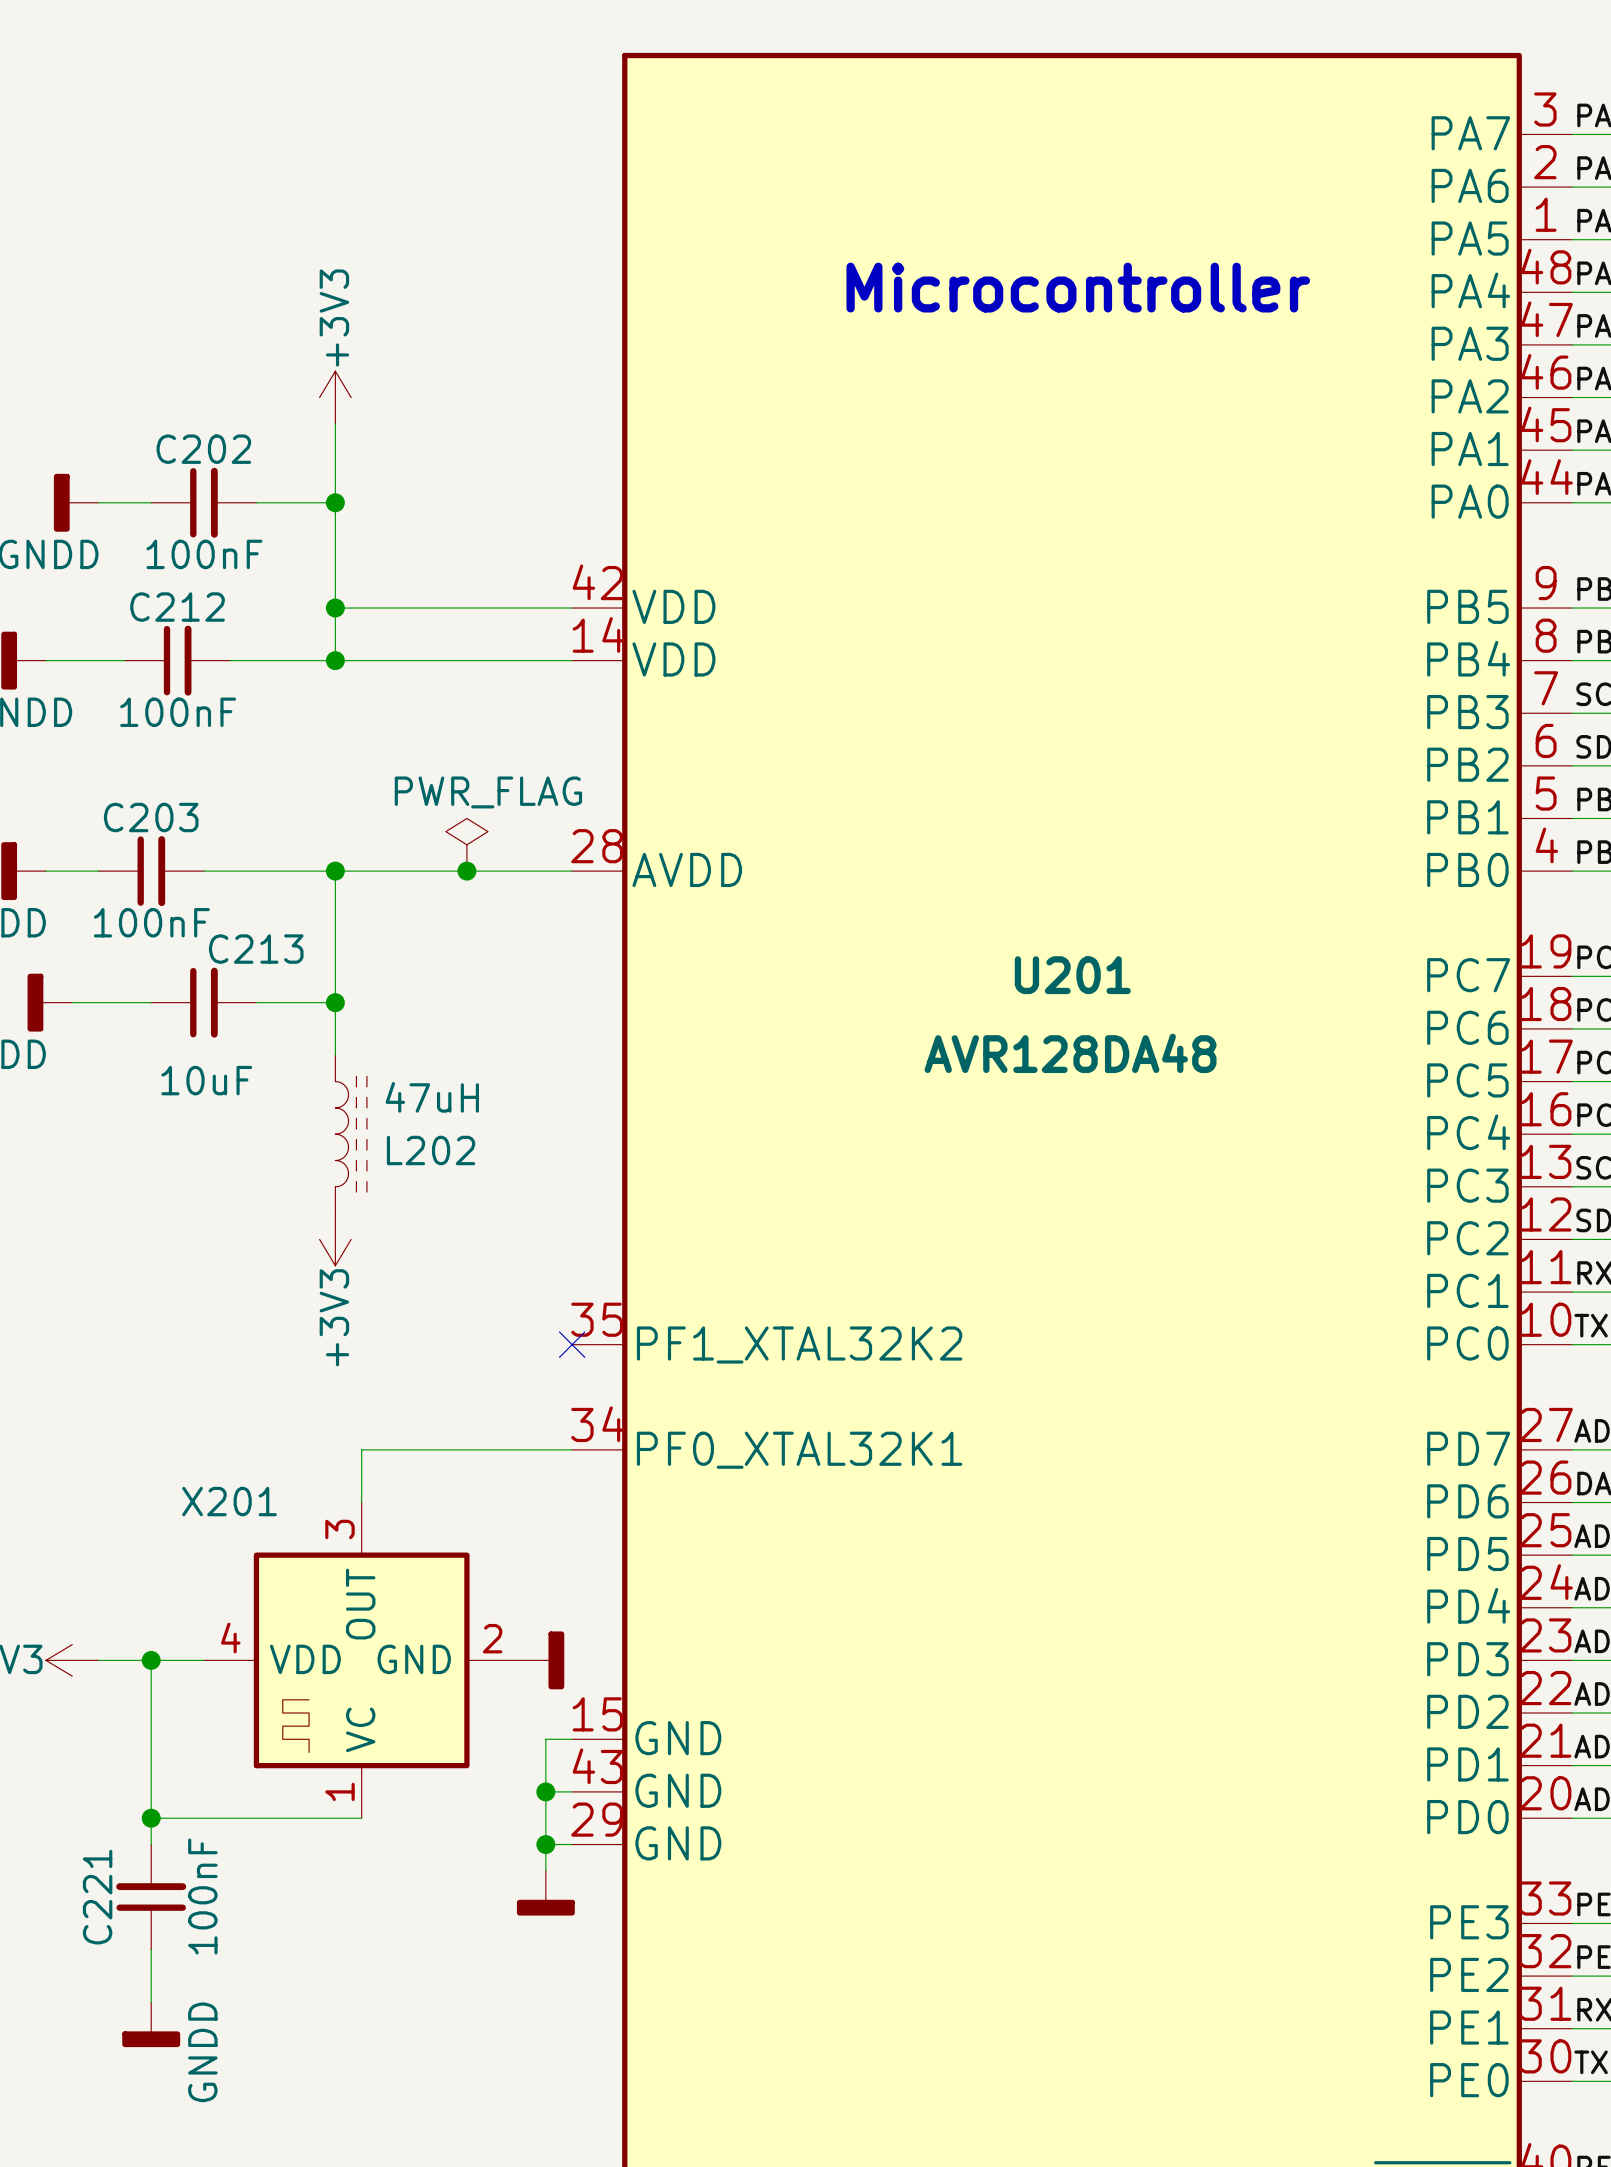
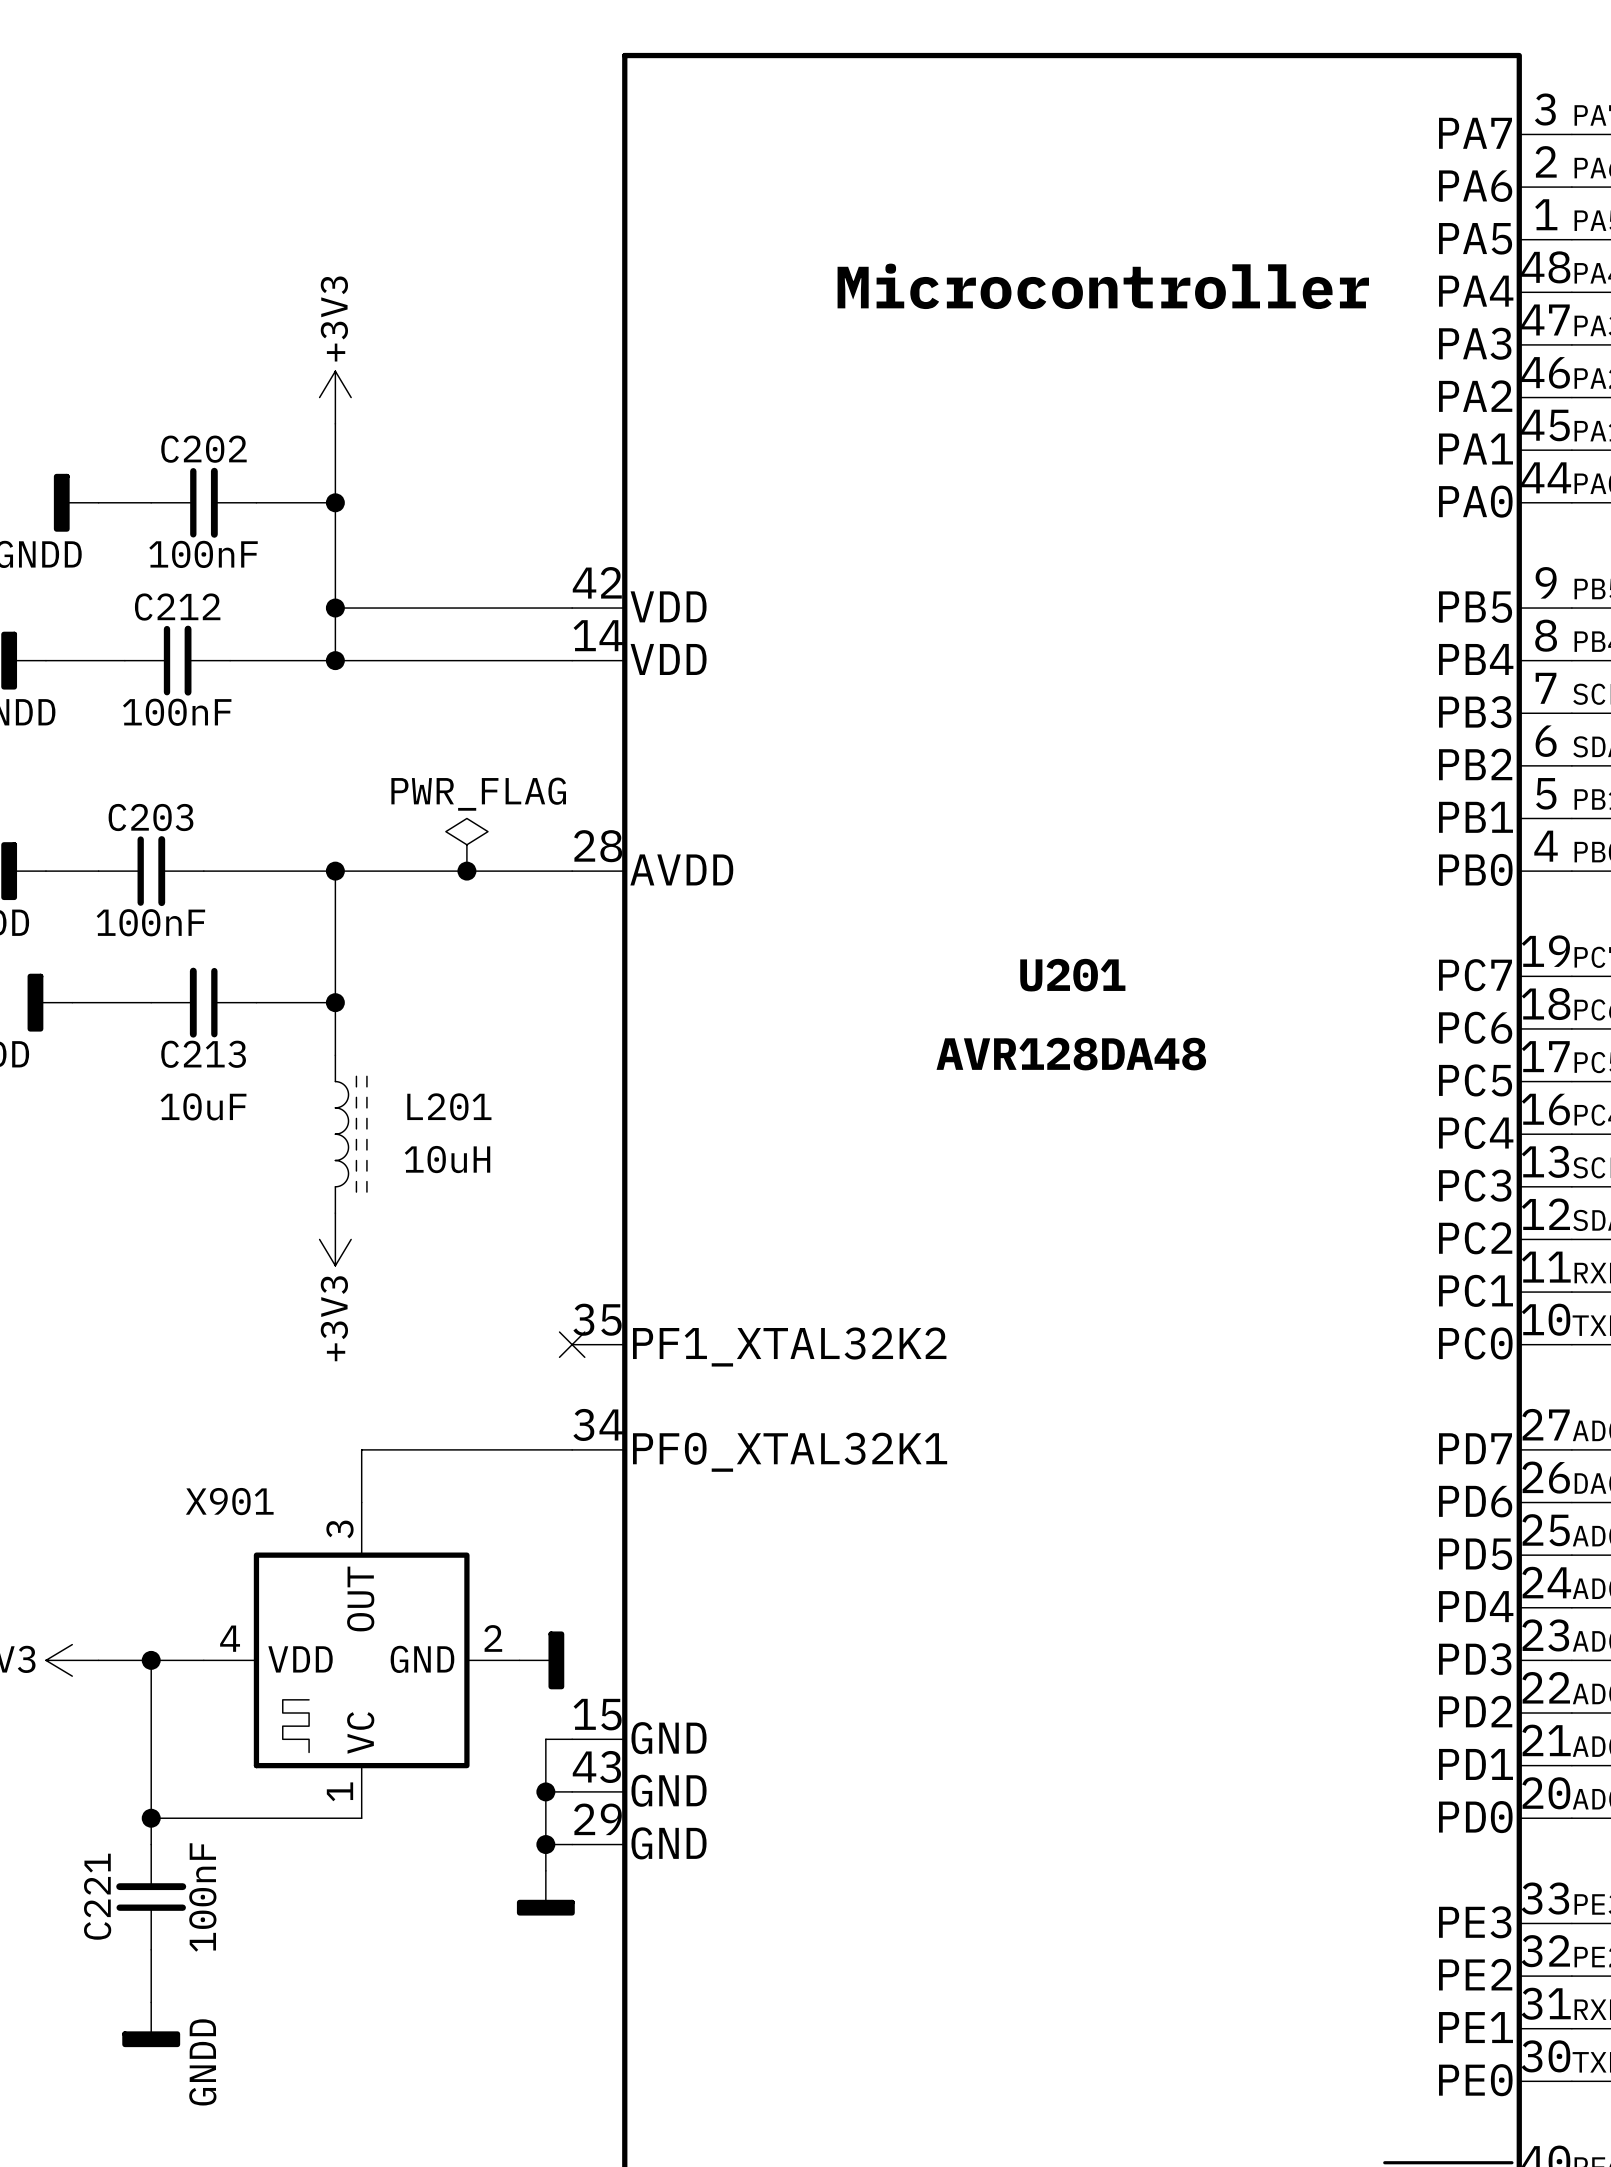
C213 name position: C213 (256, 949) -> C213 (203, 1054)
C213 rotation: 0° (203, 1002) -> 180° (203, 1002)
L202 value: 47uH (432, 1097) -> 10uH (447, 1159)
L202 name: L202 (431, 1150) -> L201 (449, 1106)
X201 name: X201 (229, 1501) -> X901 (229, 1501)

